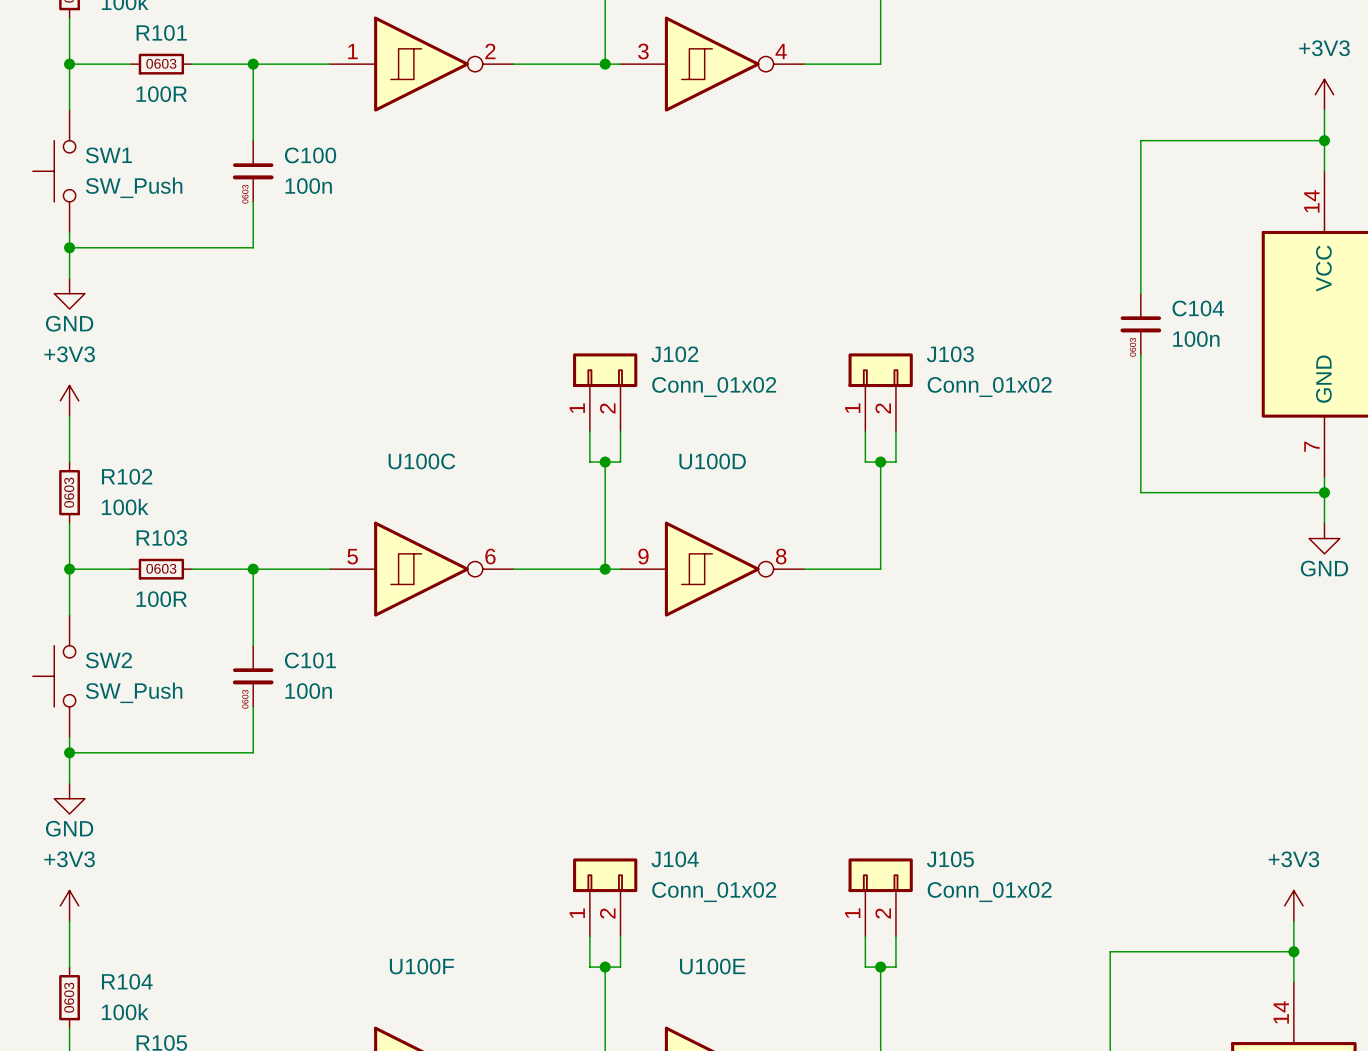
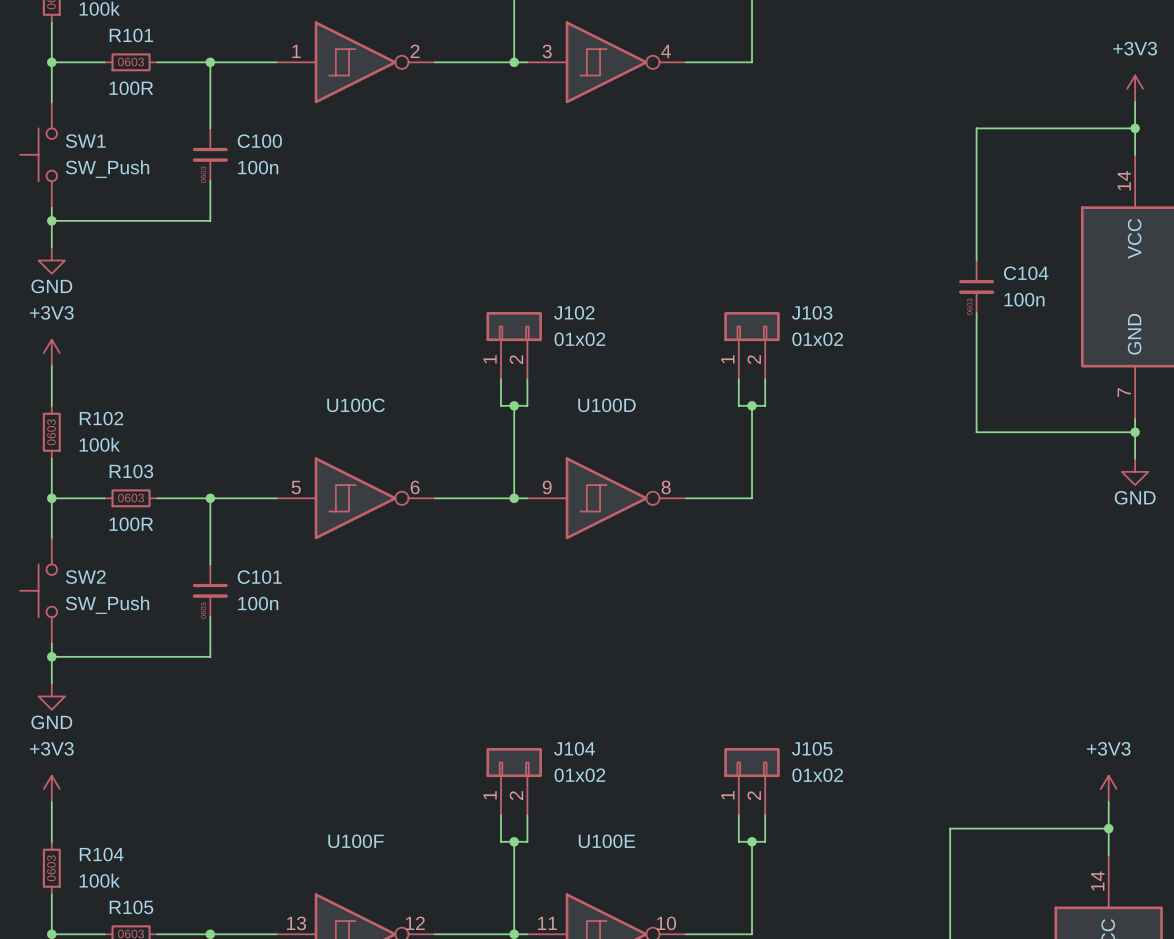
J102 value: Conn_01x02 (714, 387) -> 01x02 (579, 339)
J103 value: Conn_01x02 (989, 387) -> 01x02 (817, 339)
J104 value: Conn_01x02 (714, 892) -> 01x02 (579, 775)
J105 value: Conn_01x02 (989, 892) -> 01x02 (817, 775)

